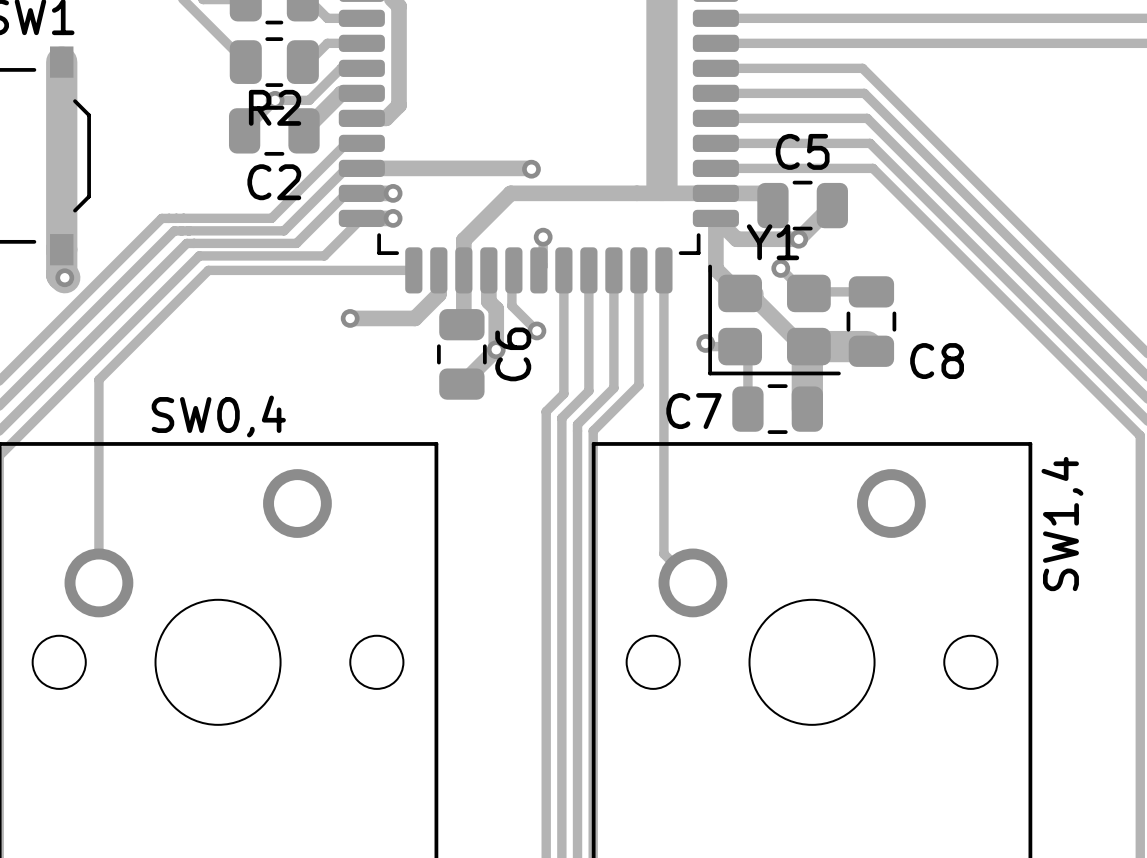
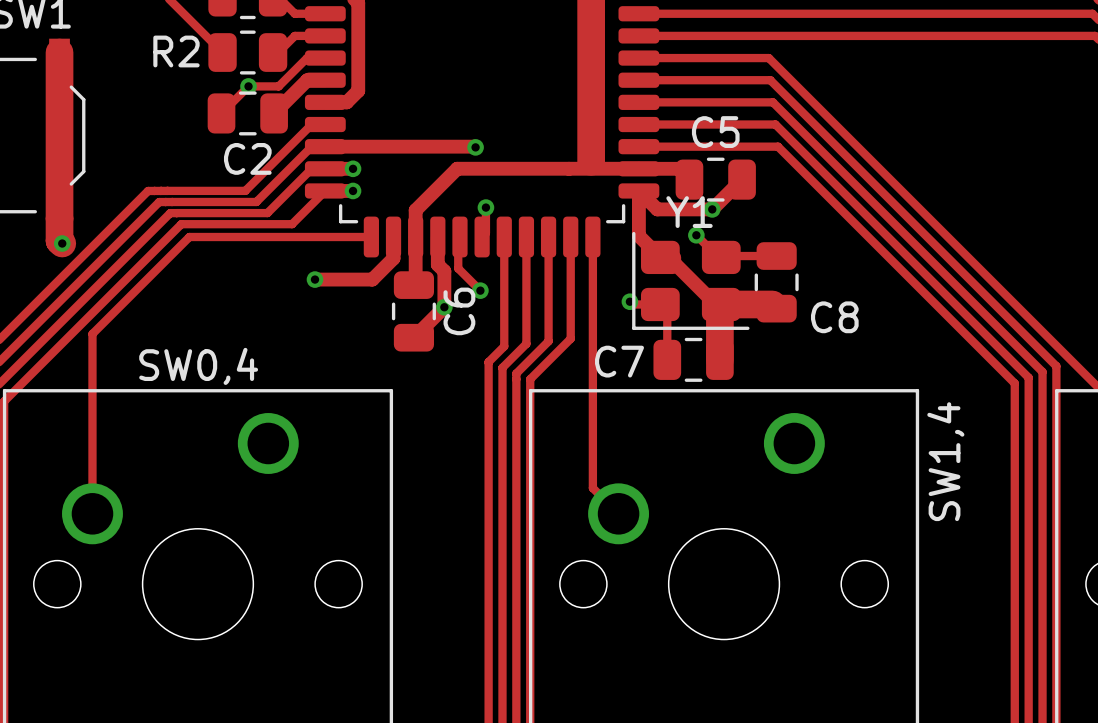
R2 name position: R2 (275, 107) -> R2 (176, 51)

